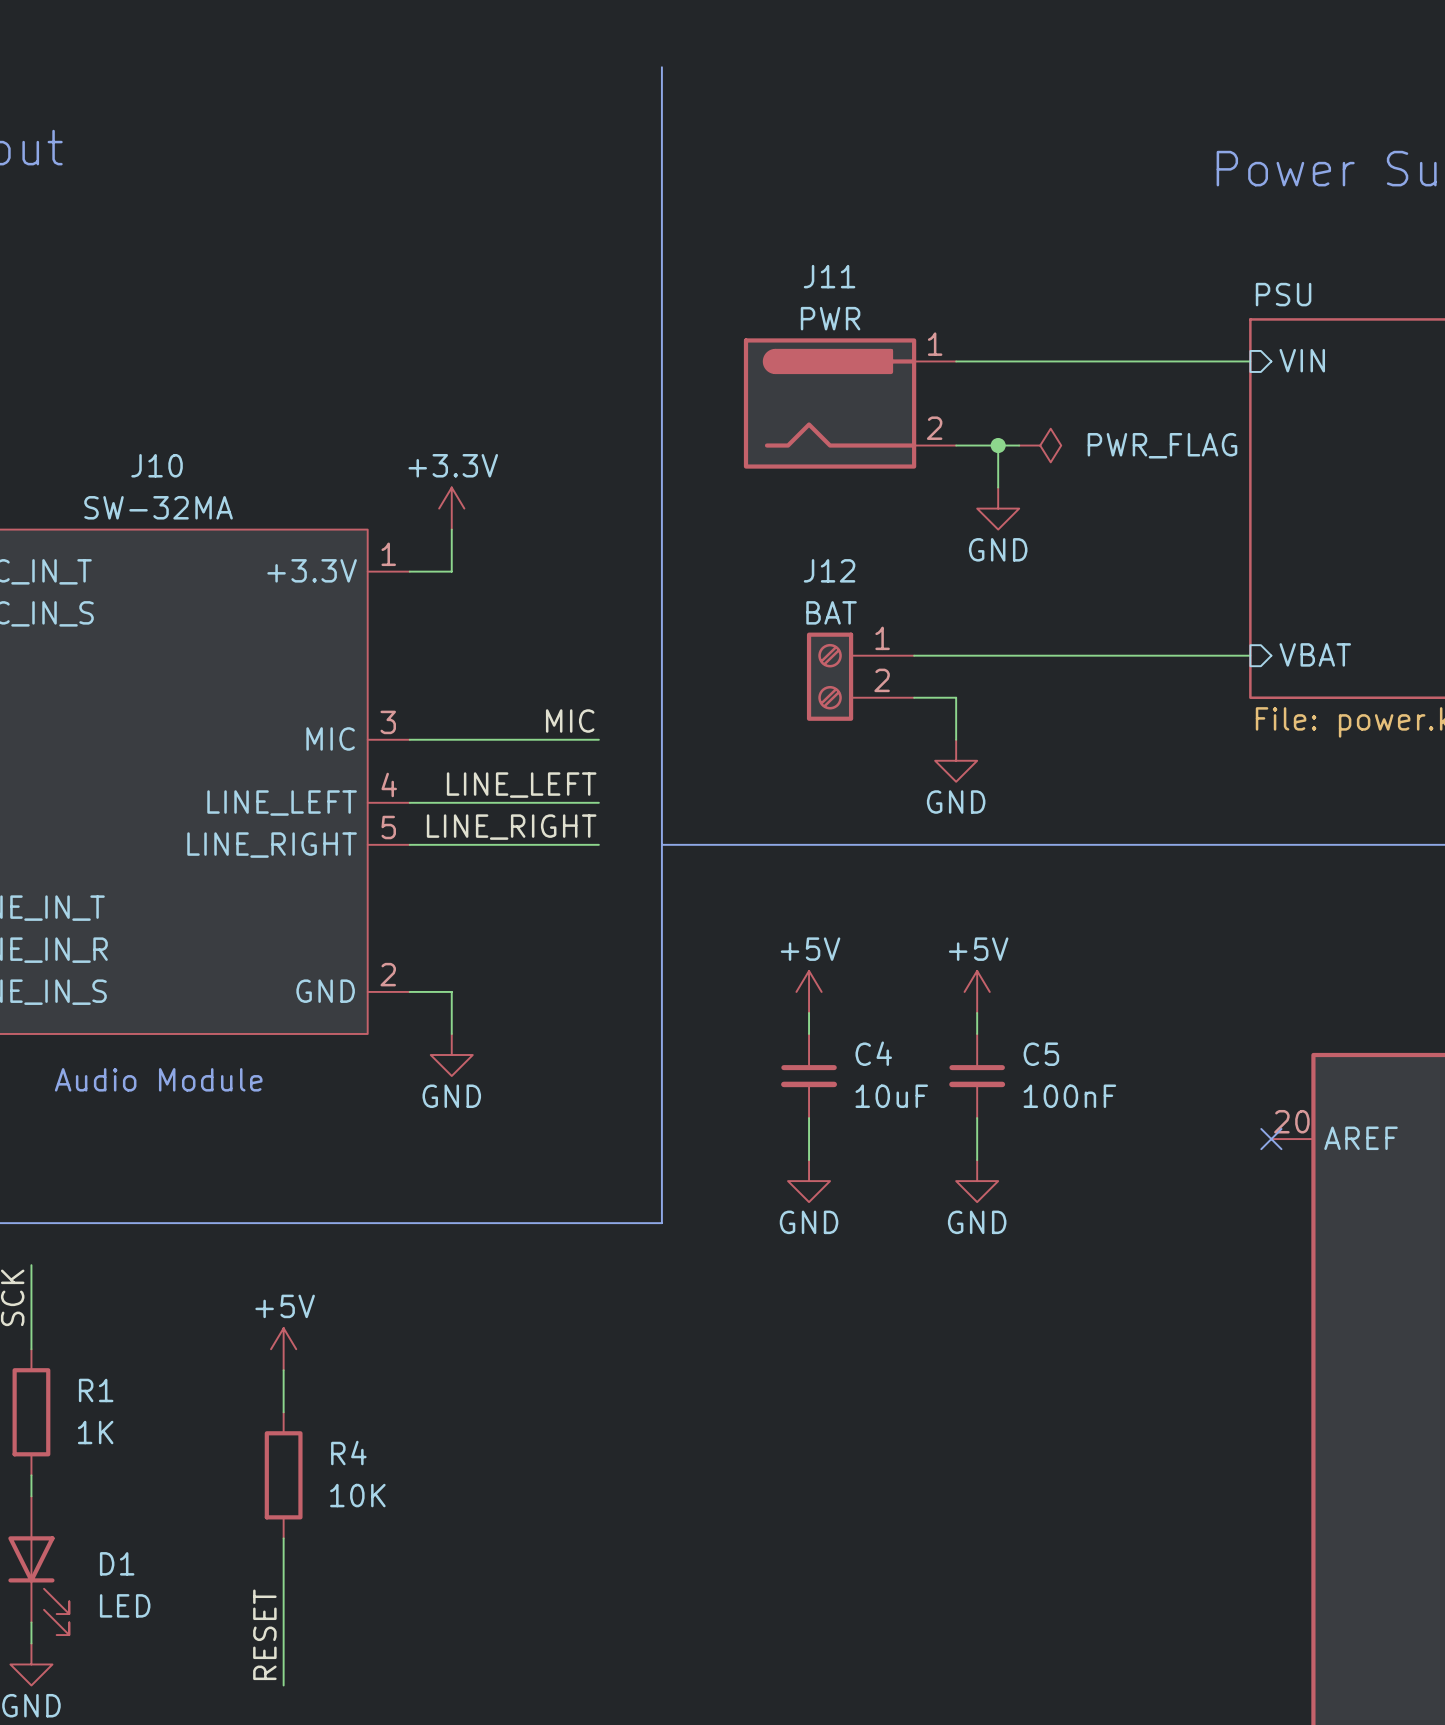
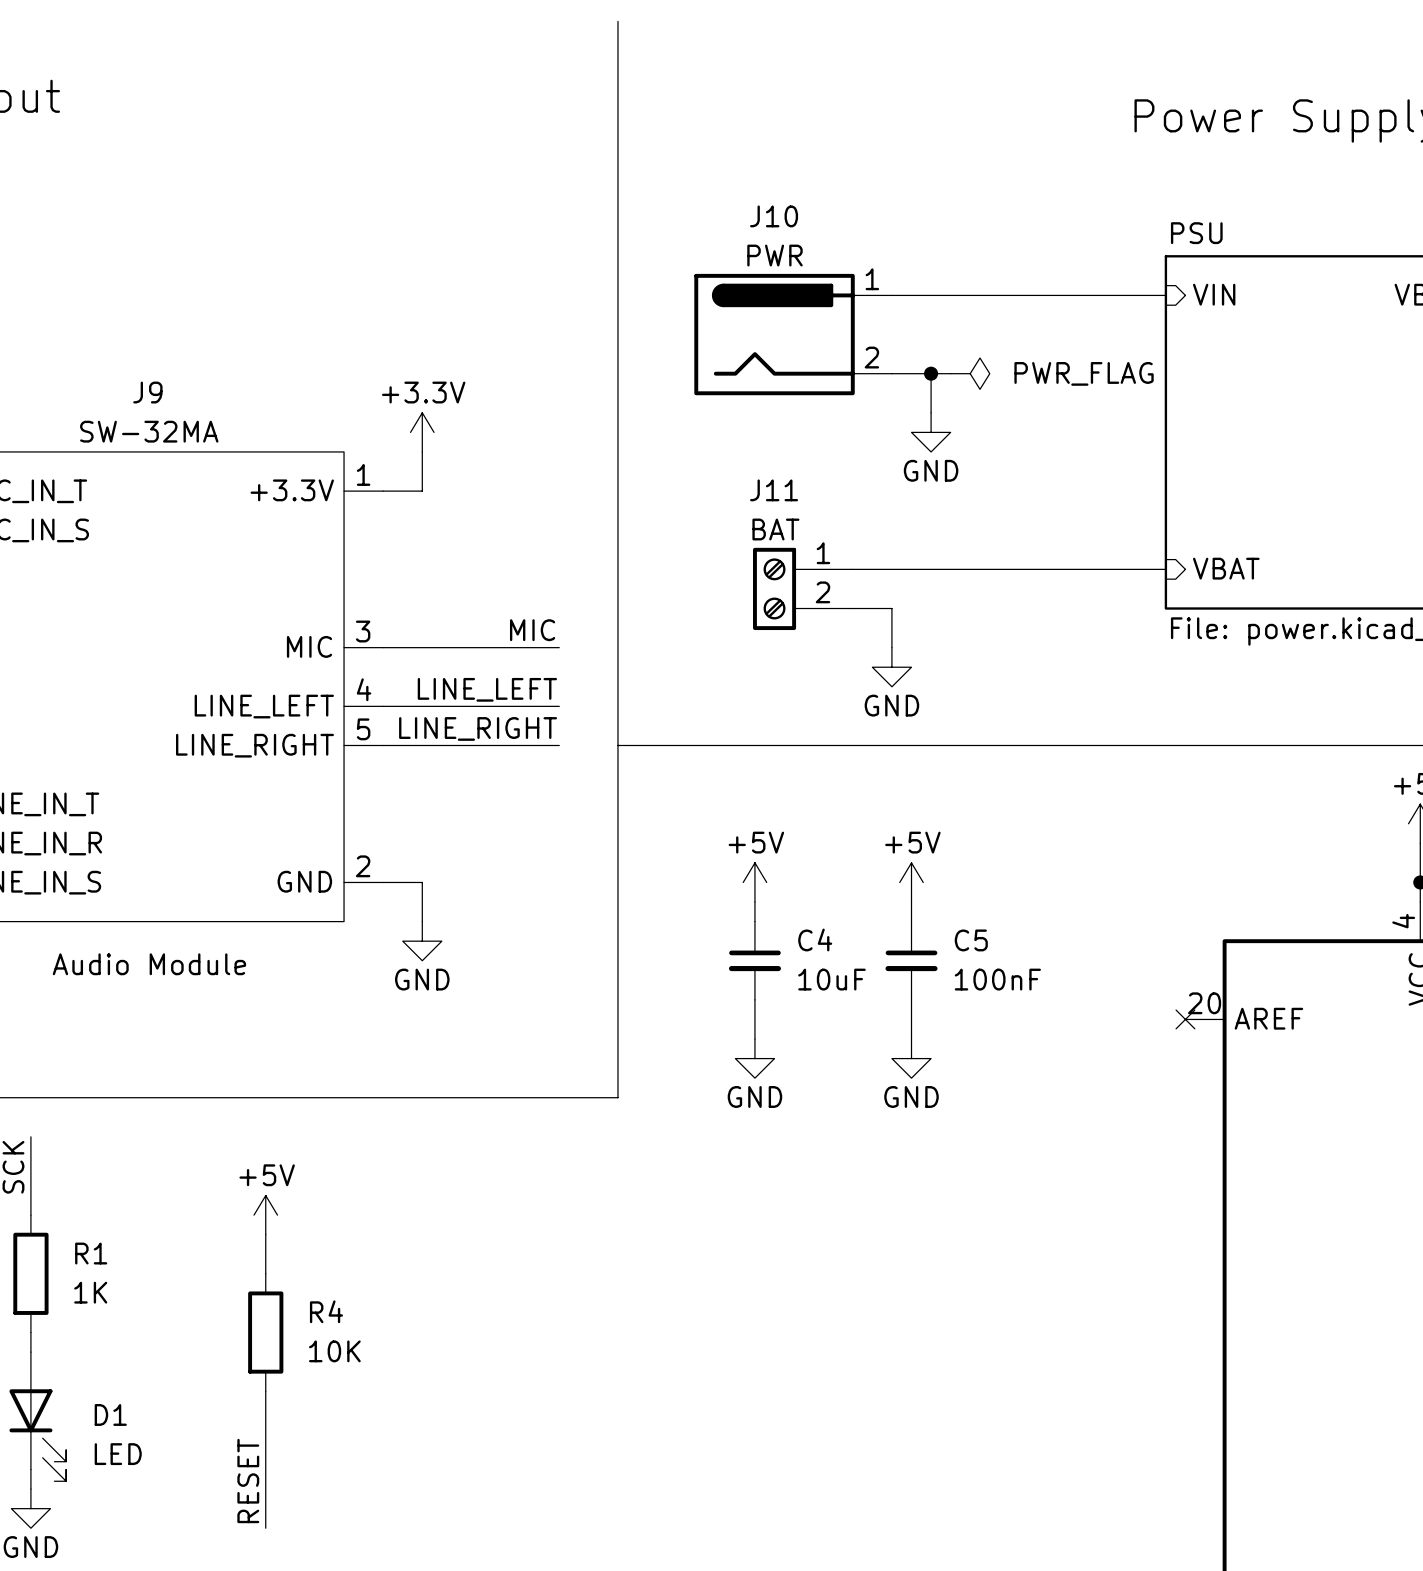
J11 name: J11 (829, 276) -> J10 (774, 216)
J10 name: J10 (157, 465) -> J9 (147, 392)
J12 name: J12 (829, 570) -> J11 (774, 490)

